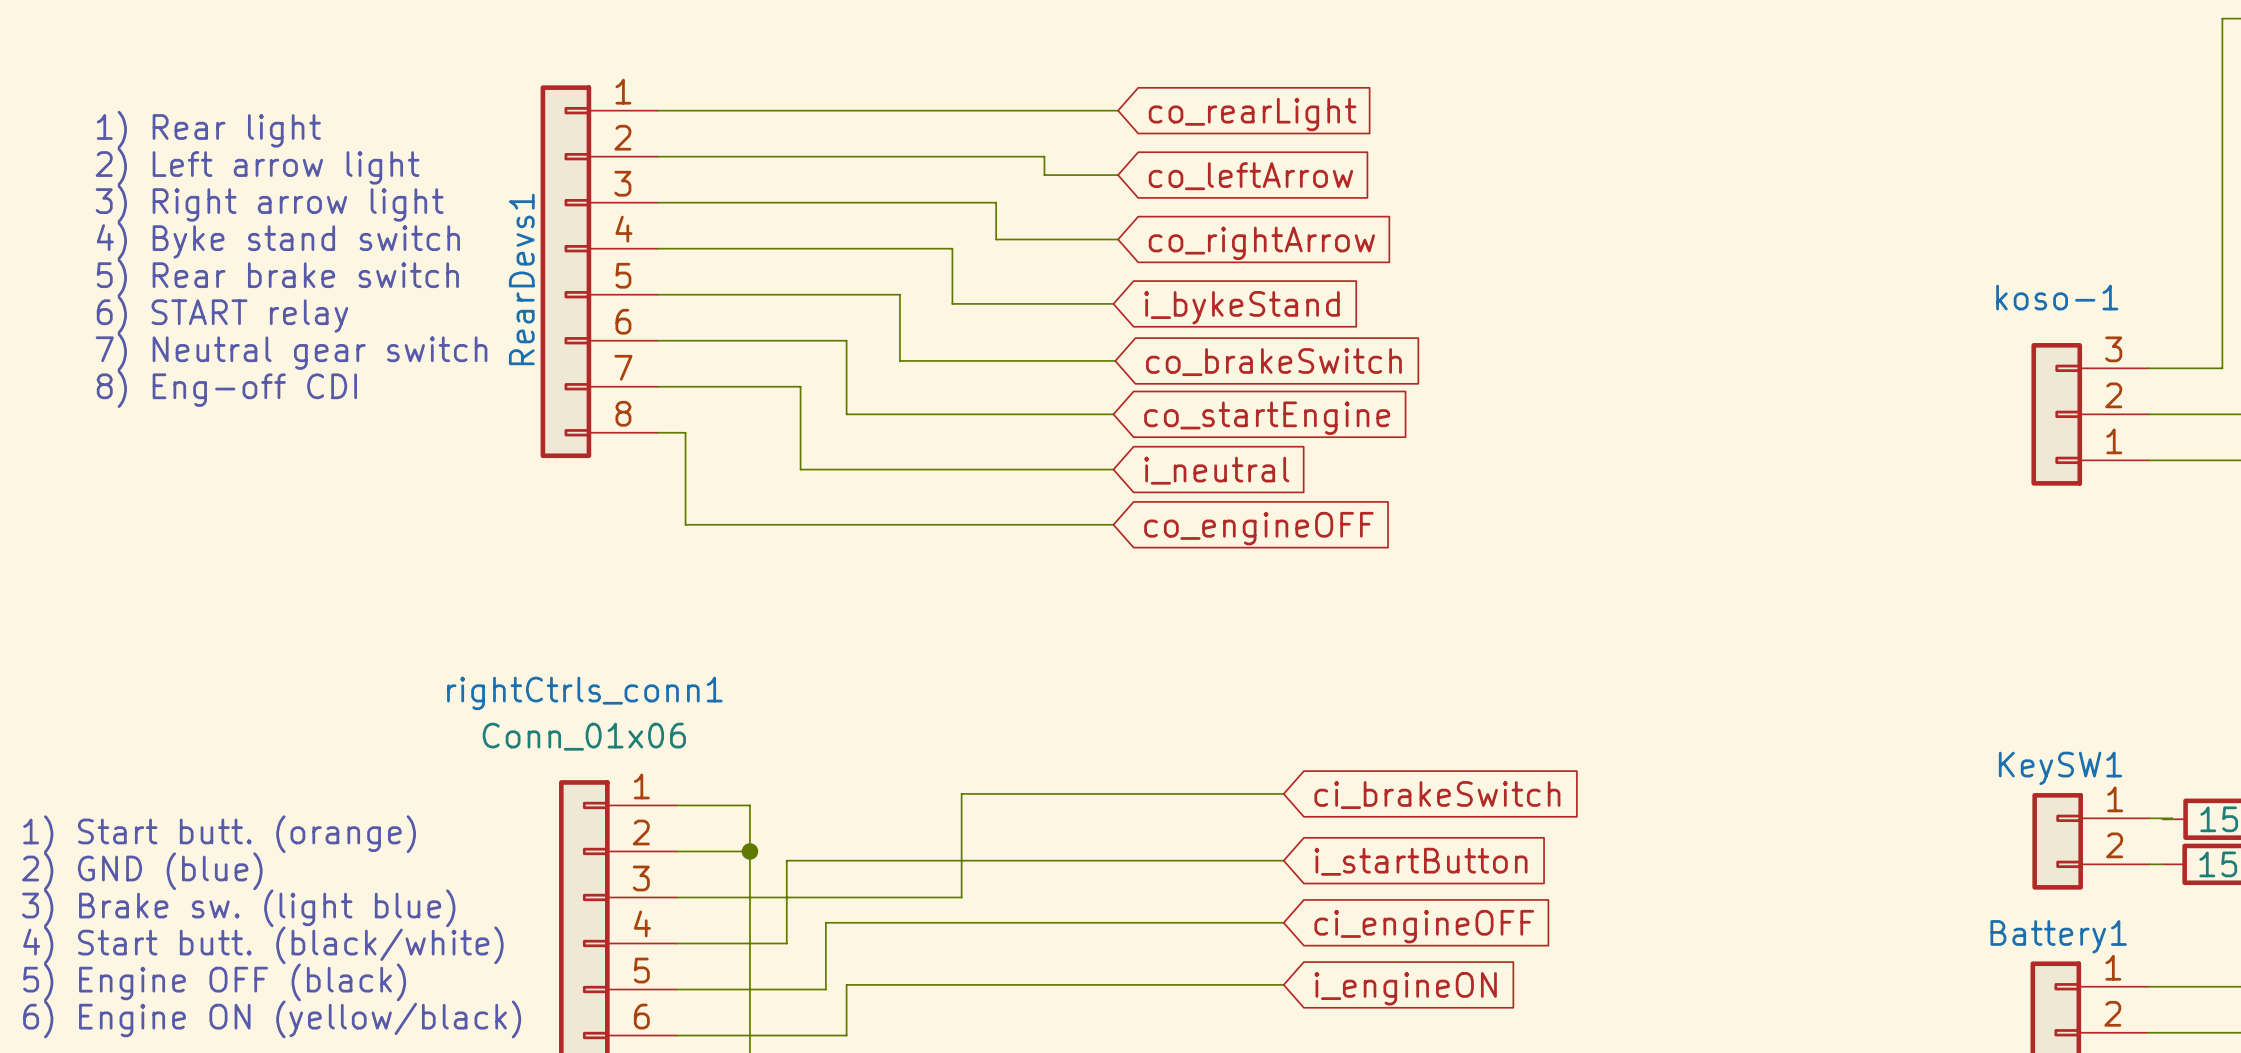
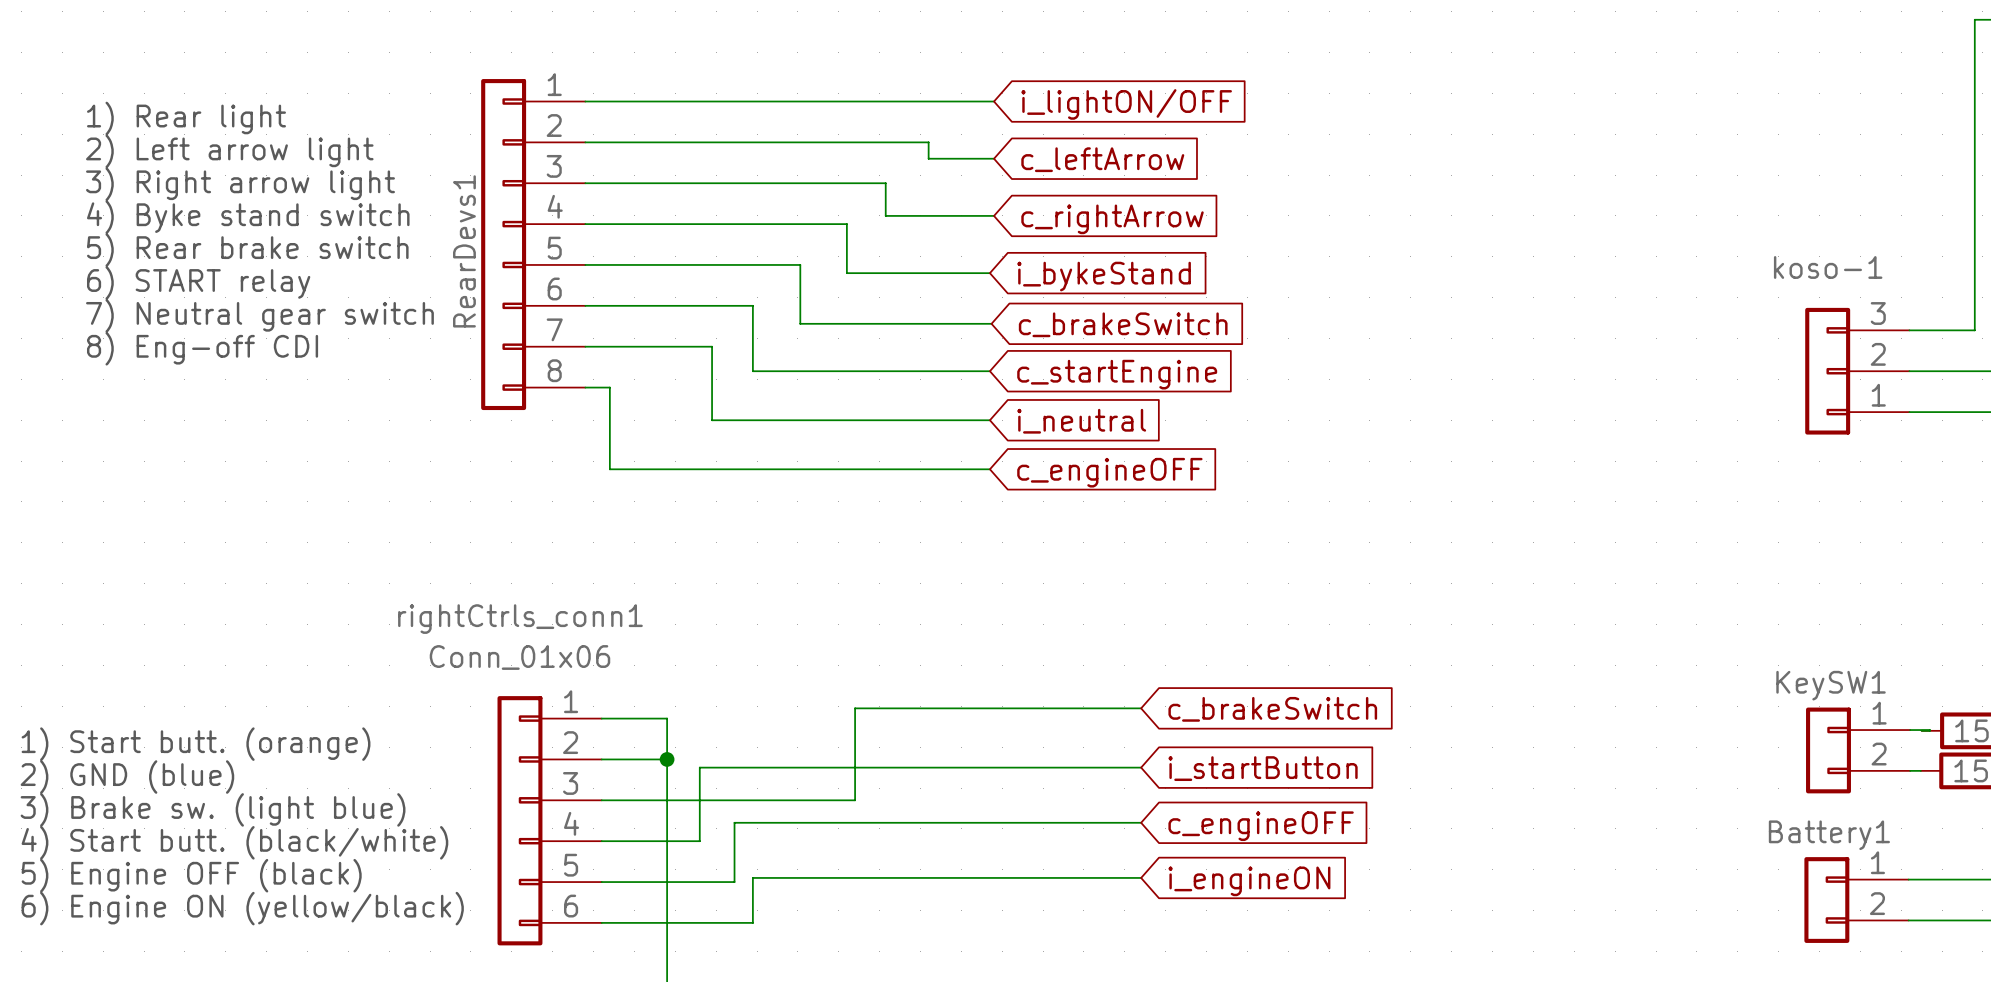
global label: co_rearLight (1252, 114) -> i_lightON/OFF (1126, 104)
global label: co_leftArrow (1250, 176) -> c_leftArrow (1102, 159)
global label: co_rightArrow (1261, 243) -> c_rightArrow (1112, 219)
global label: co_brakeSwitch (1273, 362) -> c_brakeSwitch (1123, 324)
global label: co_startEngine (1267, 418) -> c_startEngine (1117, 374)
global label: co_engineOFF (1258, 528) -> c_engineOFF (1109, 472)
global label: ci_brakeSwitch (1437, 795) -> c_brakeSwitch (1272, 709)
global label: ci_engineOFF (1424, 926) -> c_engineOFF (1261, 826)

